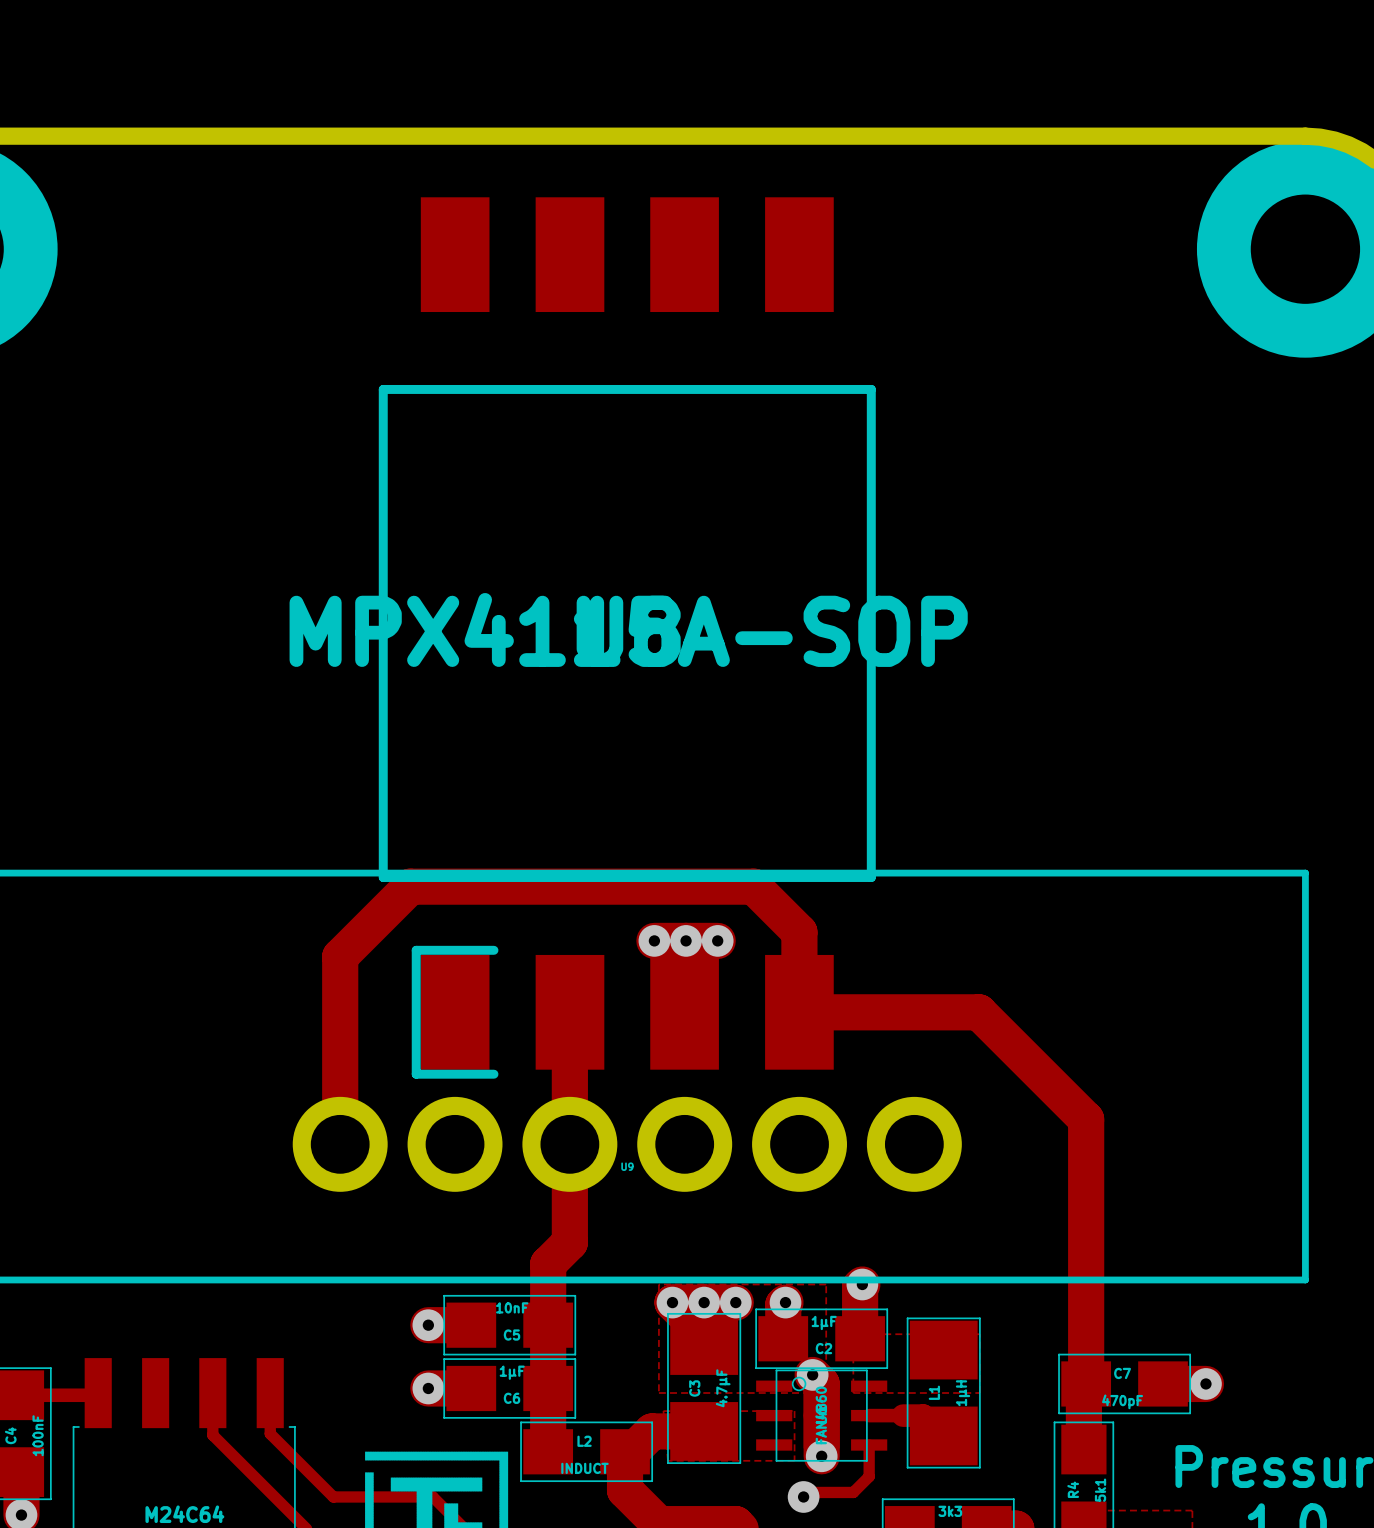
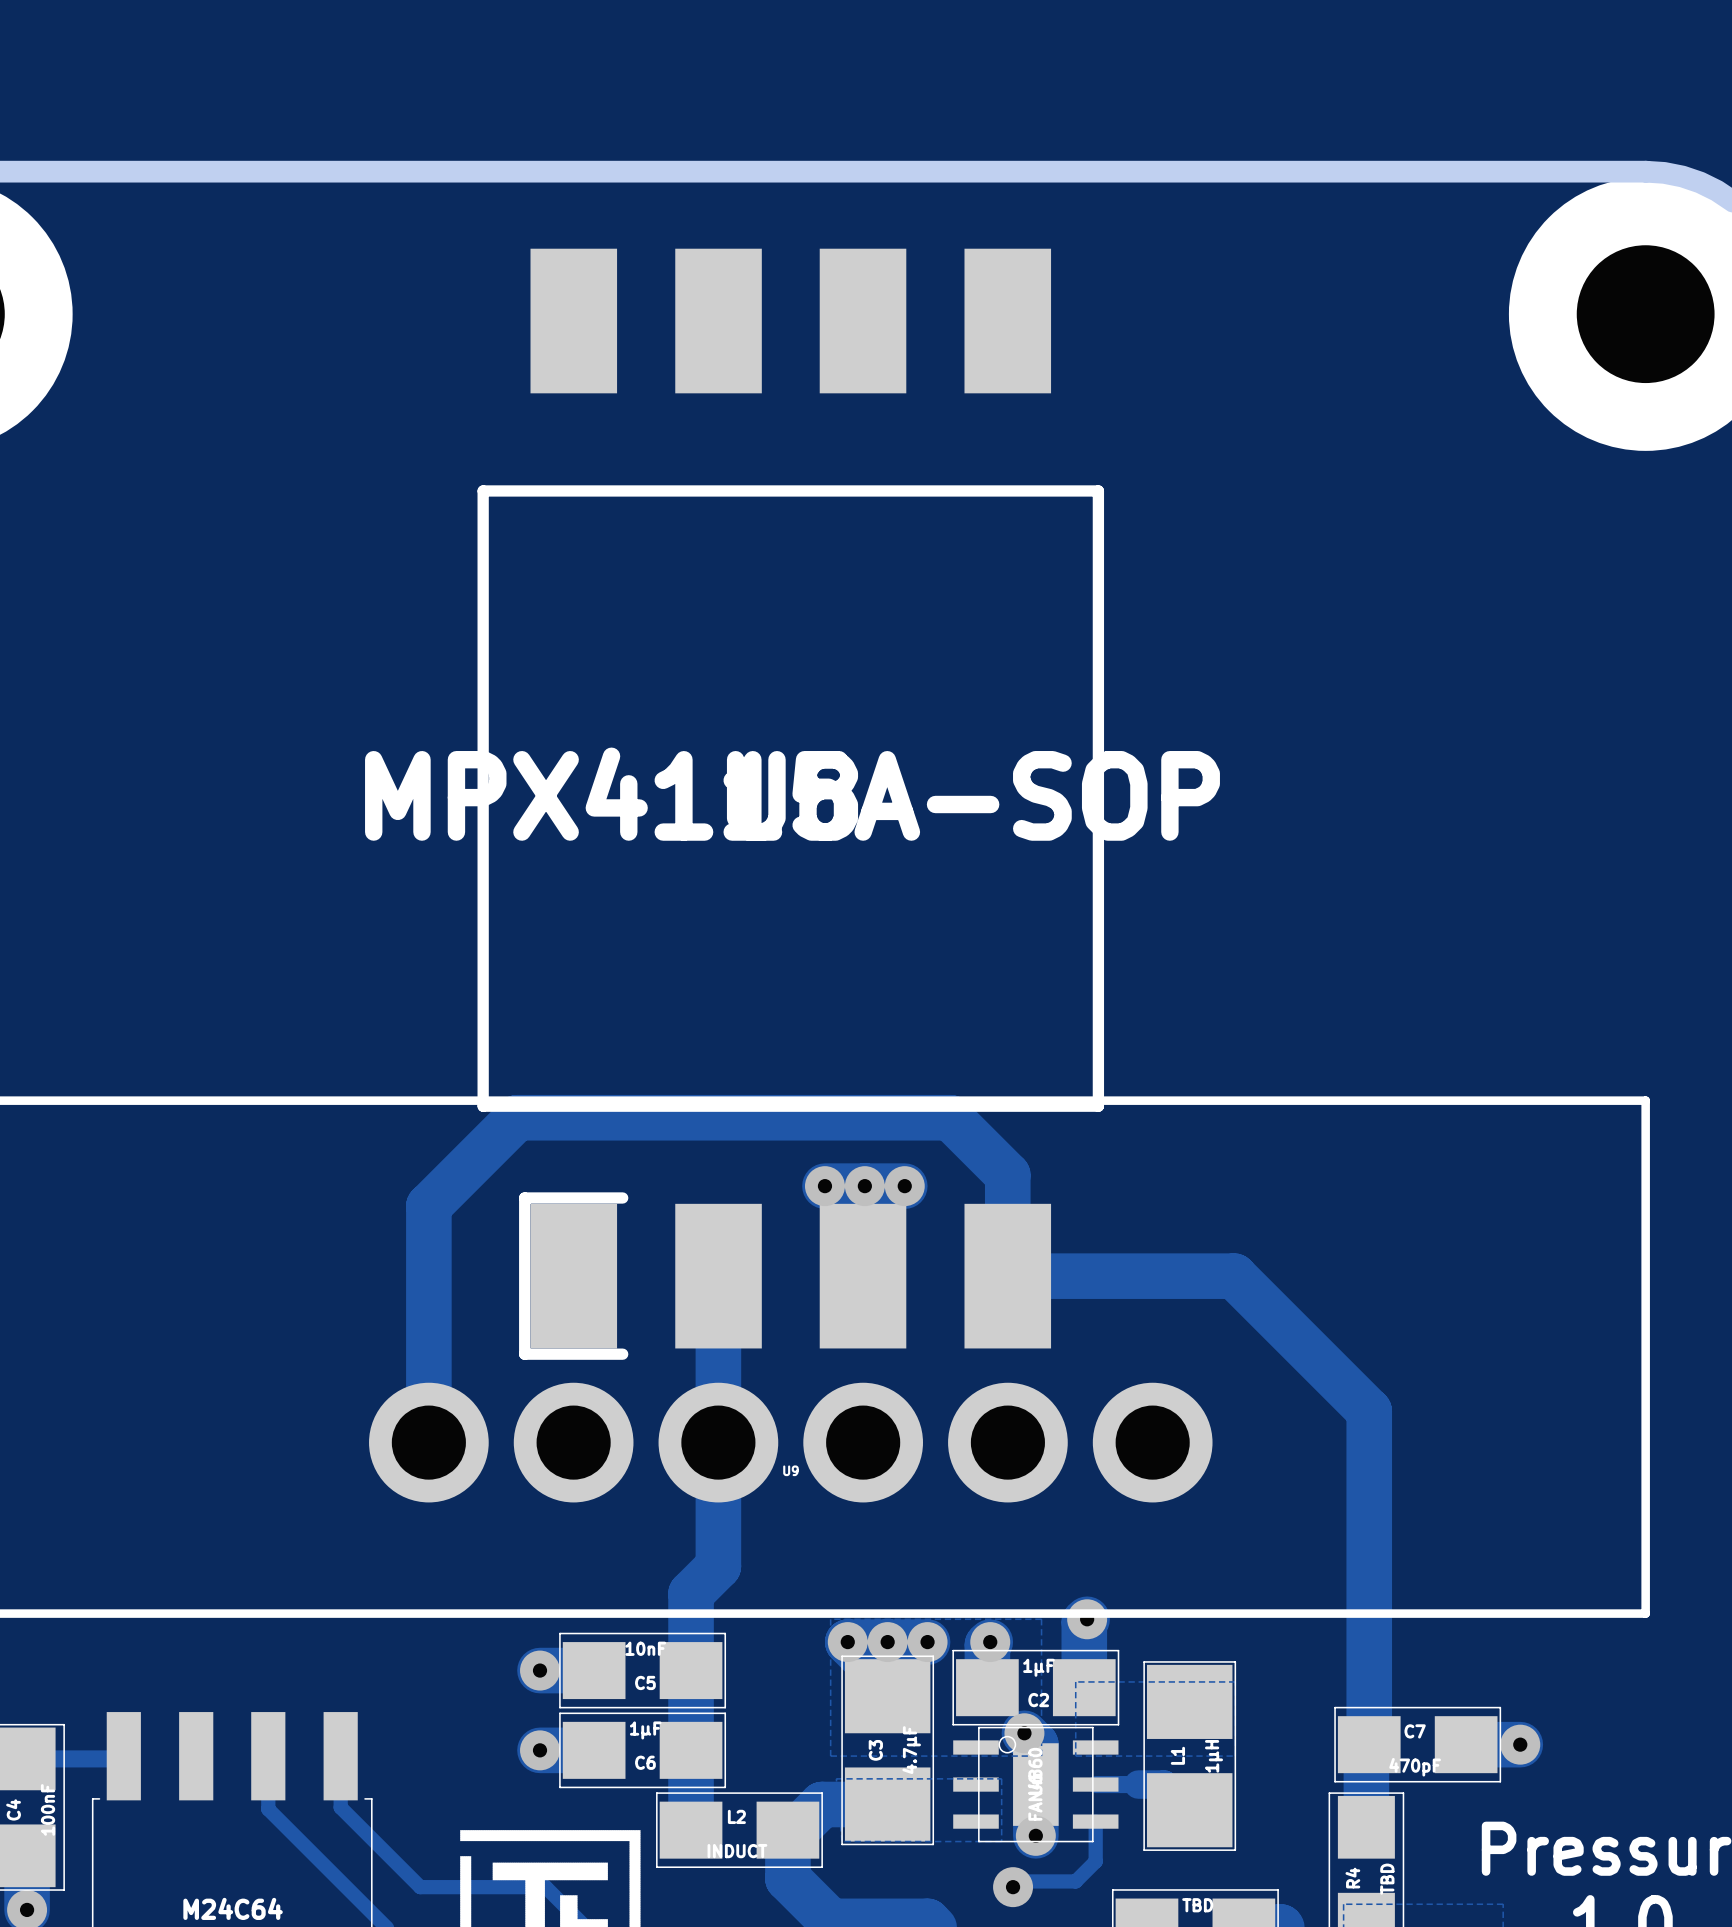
R4 value: 5k1 (1100, 1490) -> TBD (1387, 1879)
part value: 3k3 (950, 1511) -> TBD (1197, 1905)

